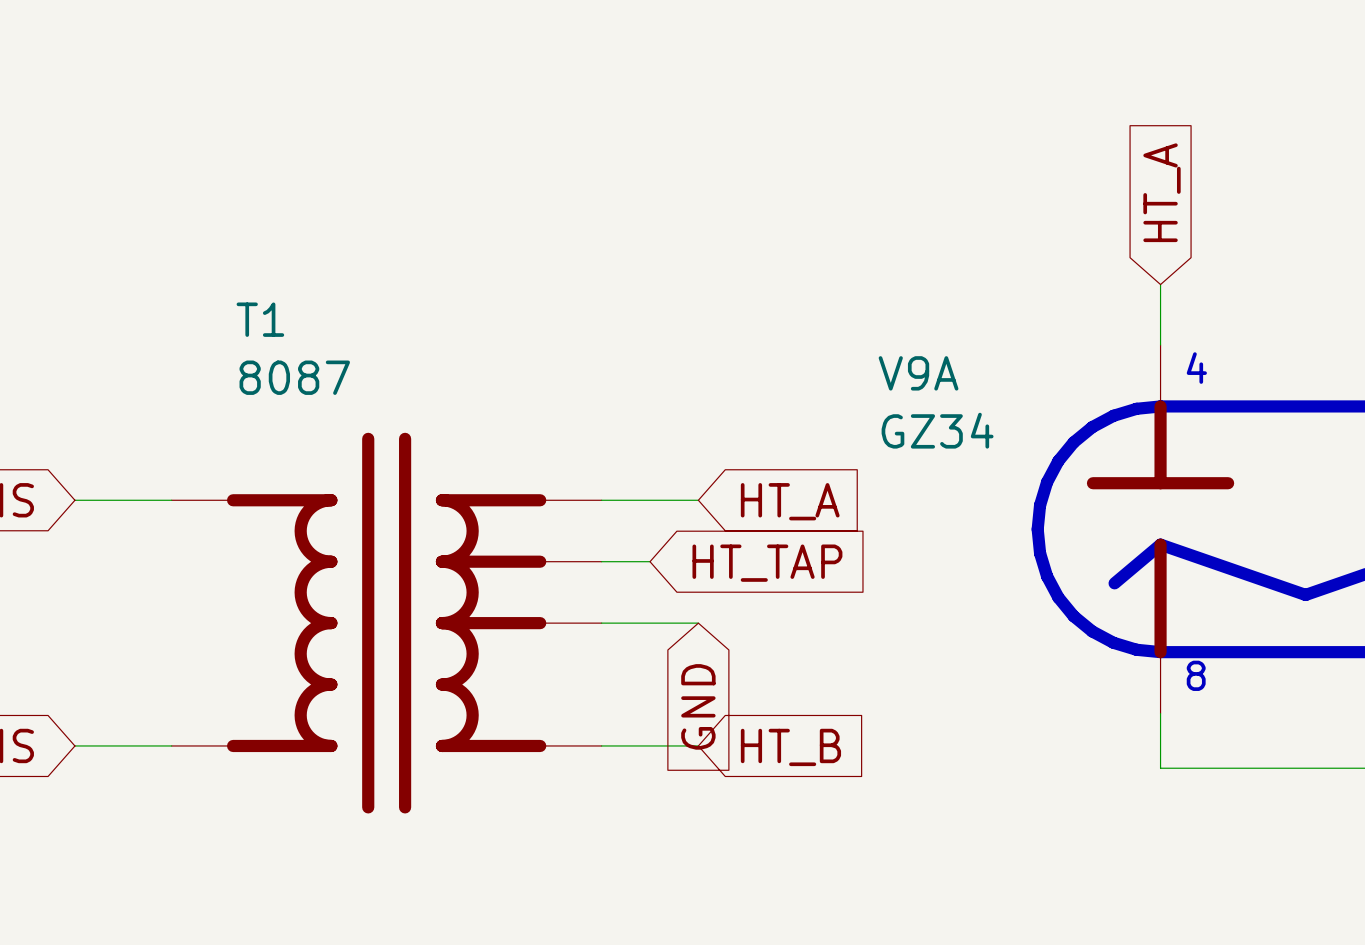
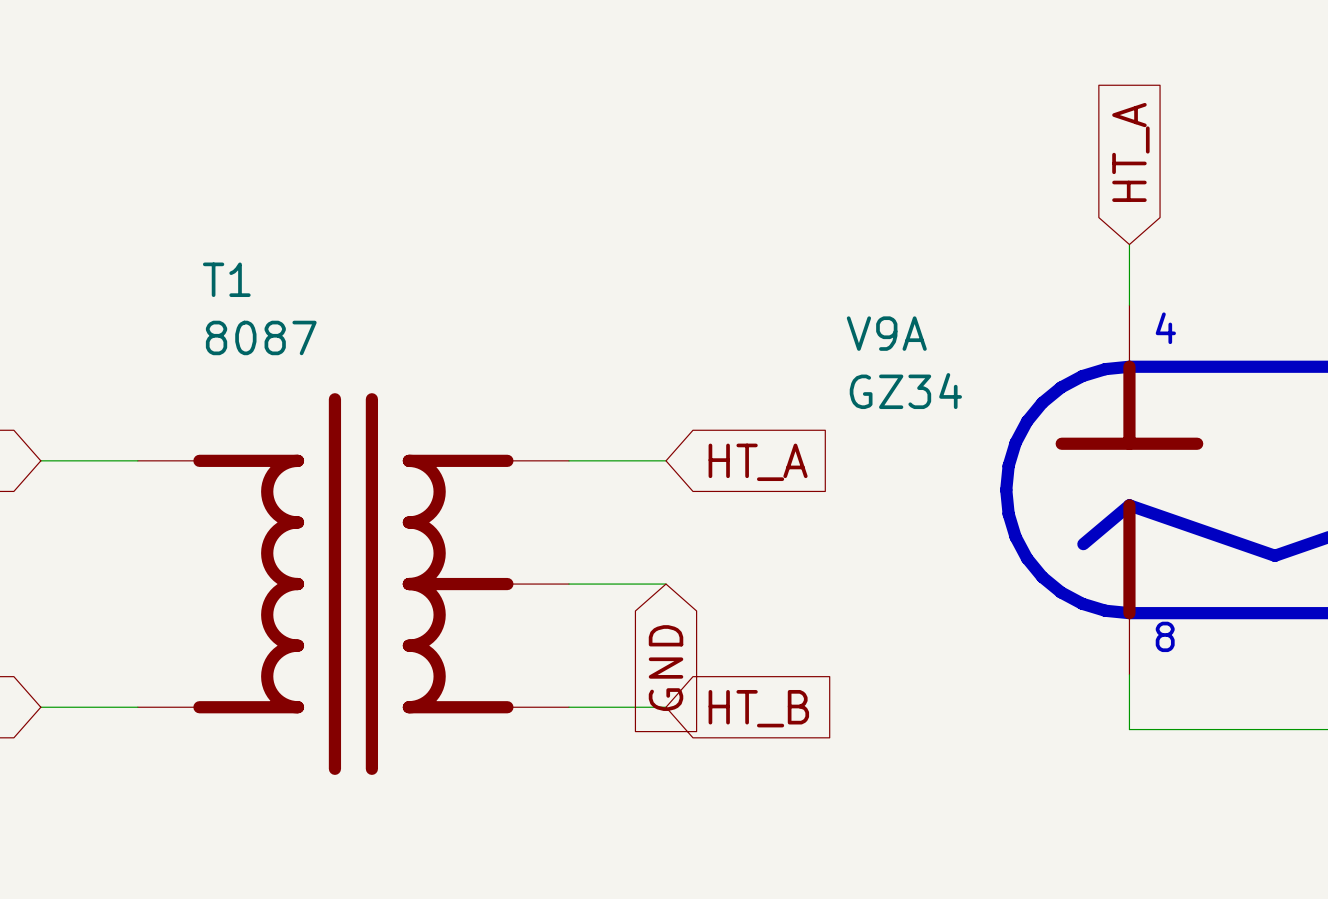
T1 symbol: [171, 432, 602, 814] -> [137, 393, 570, 775]
wire: (601, 561) (650, 561) -> none
global label: HT_TAP (767, 563) -> none

